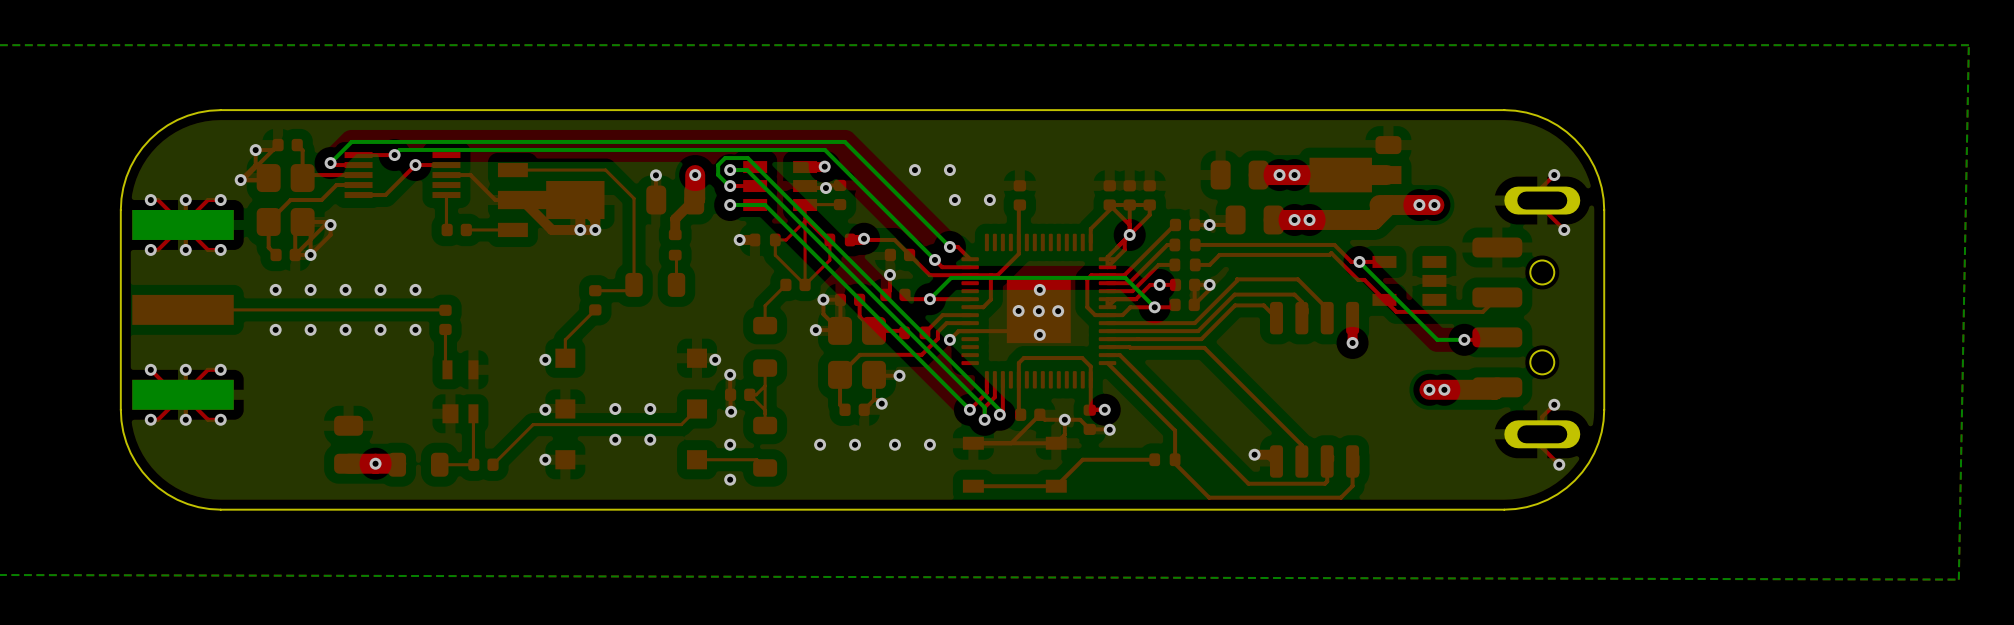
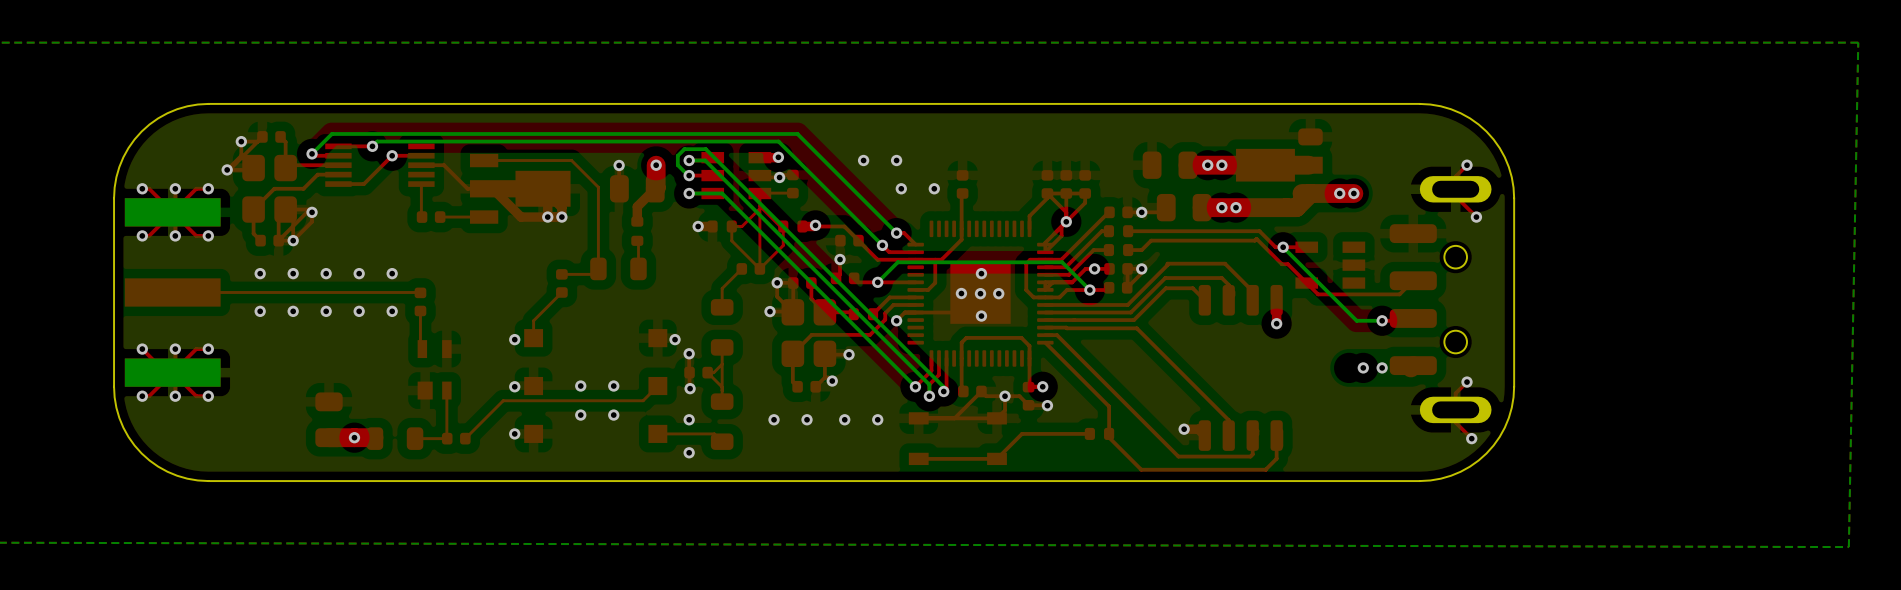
via position: (1429, 389) -> (1382, 367)
top track: (1494, 389) (1429, 389) -> none

